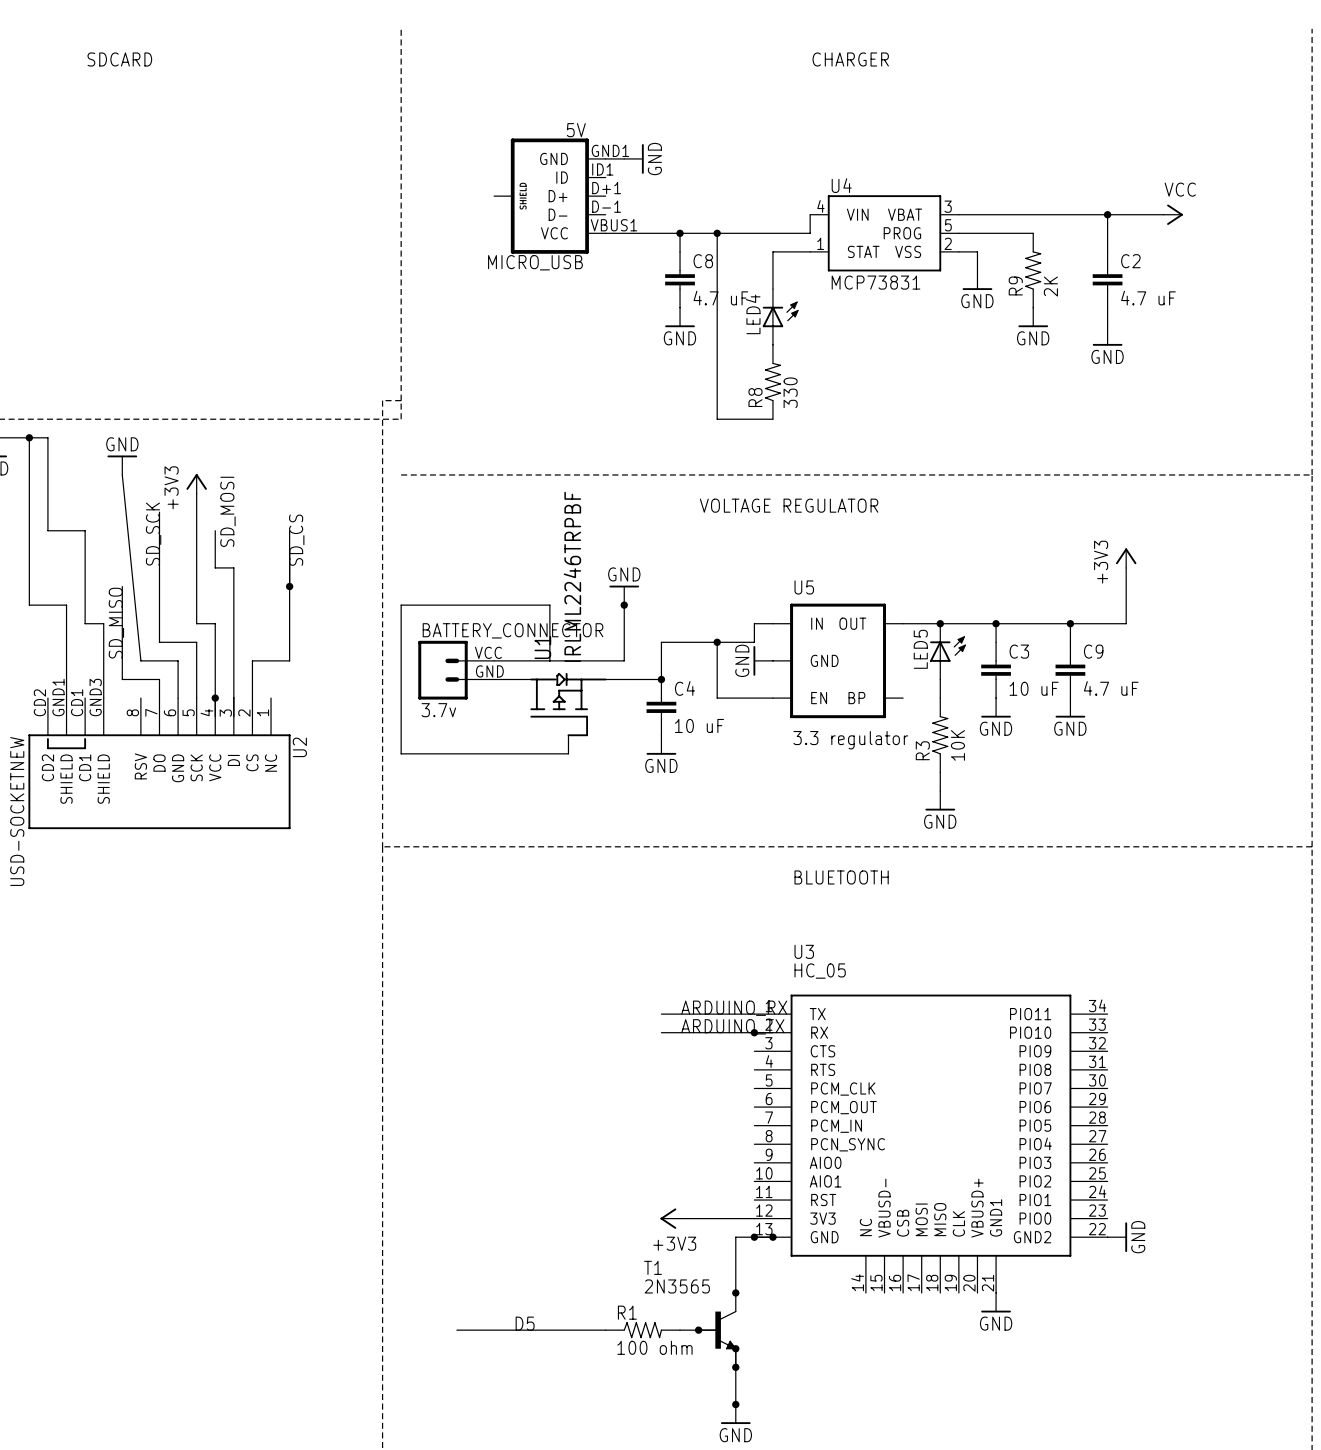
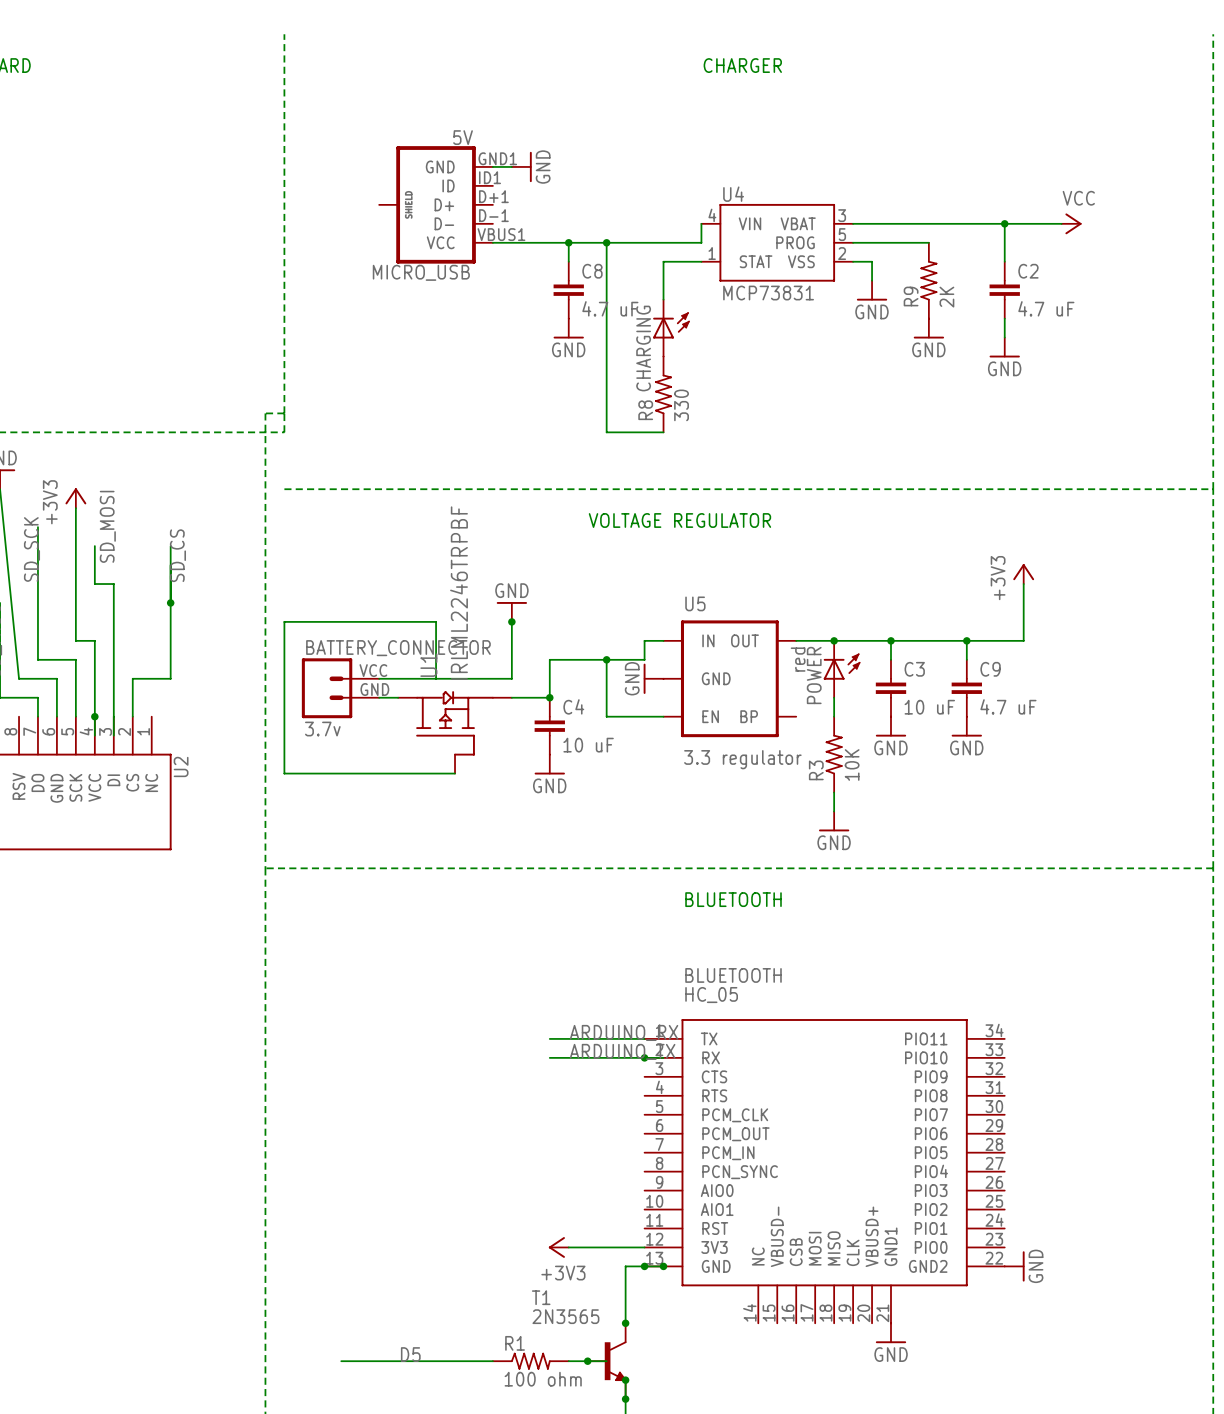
LED4 name: LED4 (753, 314) -> CHARGING (643, 348)
LED5 value: none -> red (798, 659)
LED5 name: LED5 (920, 649) -> POWER (814, 675)
U3 name: U3 (804, 951) -> BLUETOOTH (733, 975)

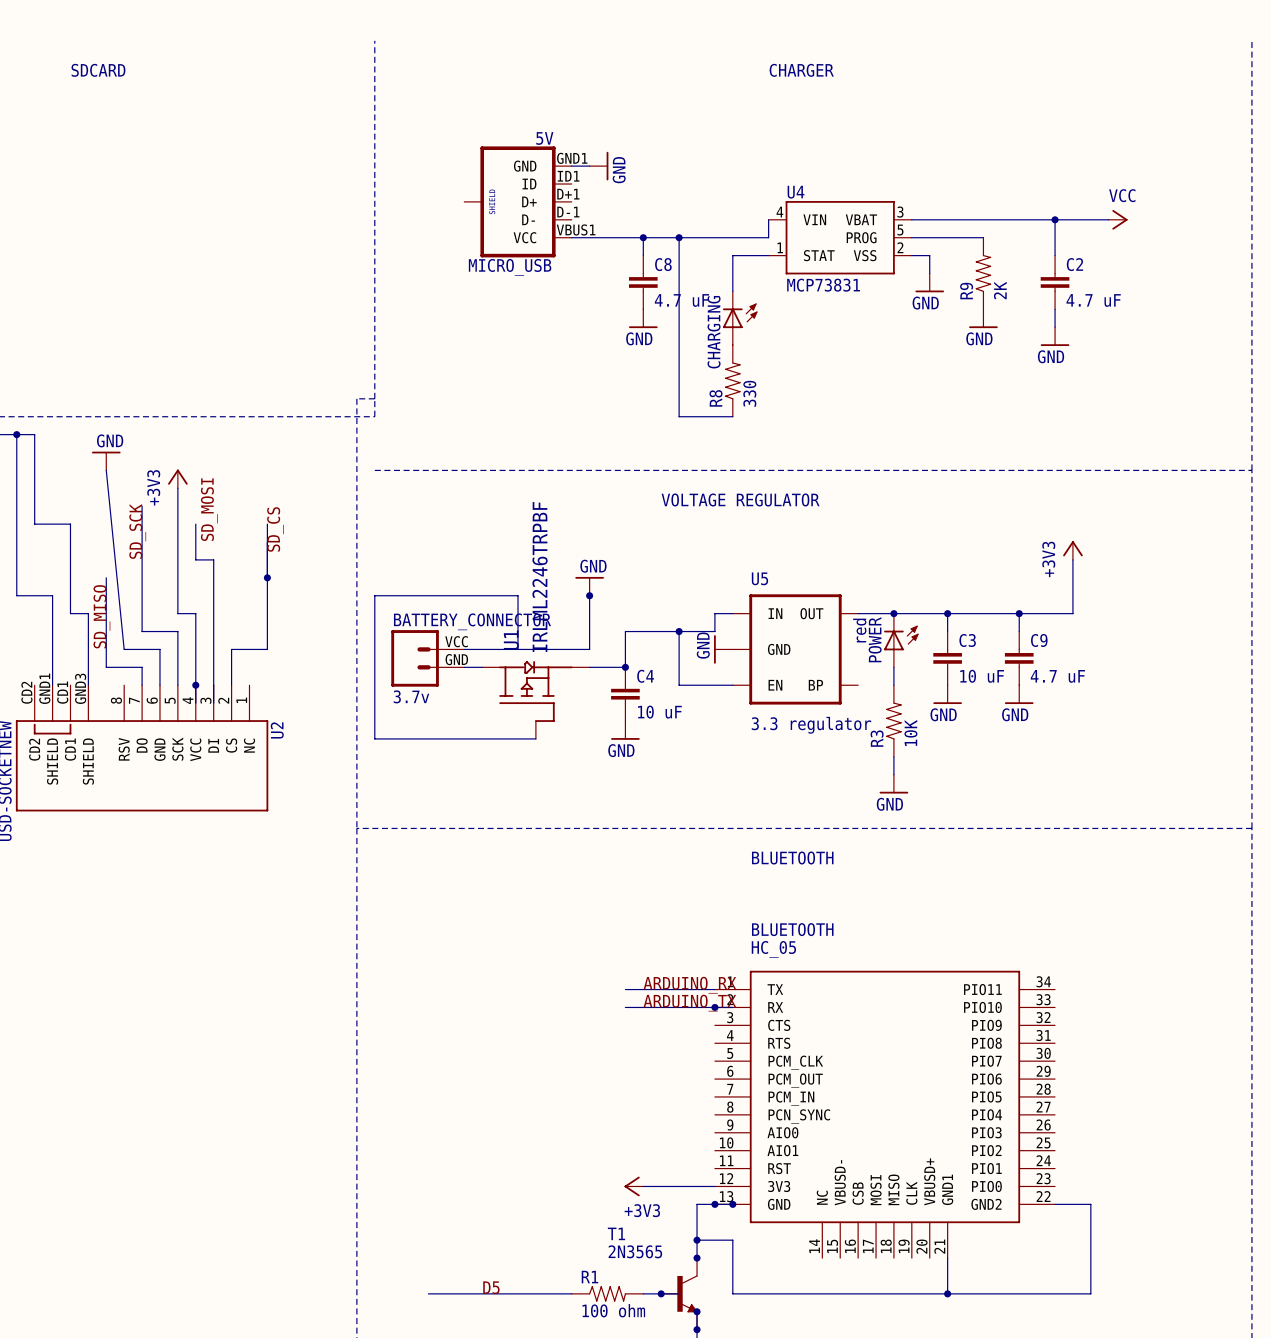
wire: none -> (1055, 1204) (1090, 1204) (1090, 1293) (732, 1293) (732, 1240) (697, 1240)
power symbol: GND (1014, 1266) -> none
junction: none -> (697, 1240)
power symbol: GND (890, 1333) -> none
junction: none -> (947, 1293)

